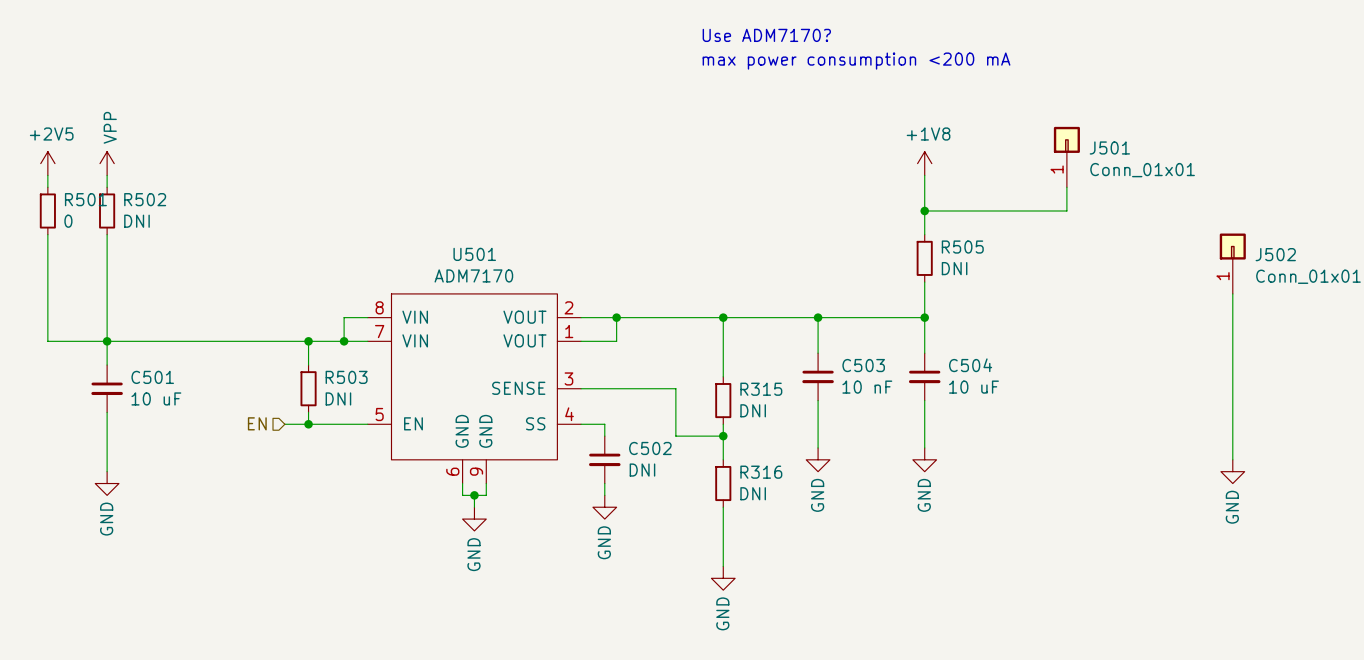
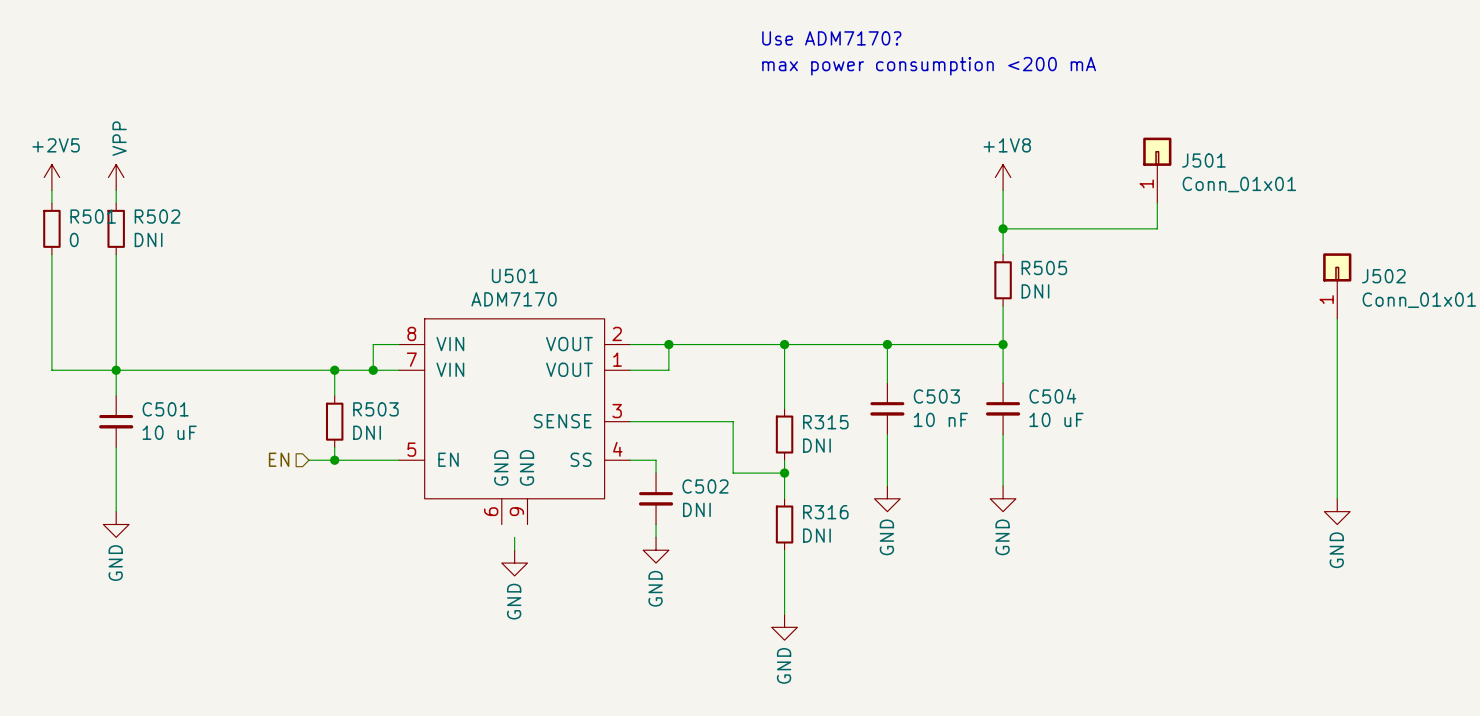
wire: (462, 483) (462, 495) (486, 495) (486, 483) -> none
junction: (474, 495) -> none

